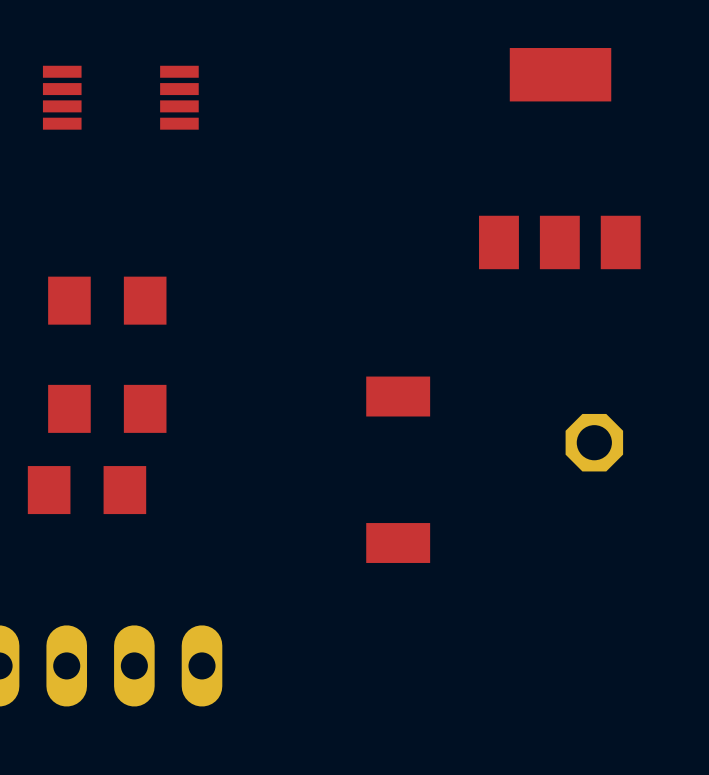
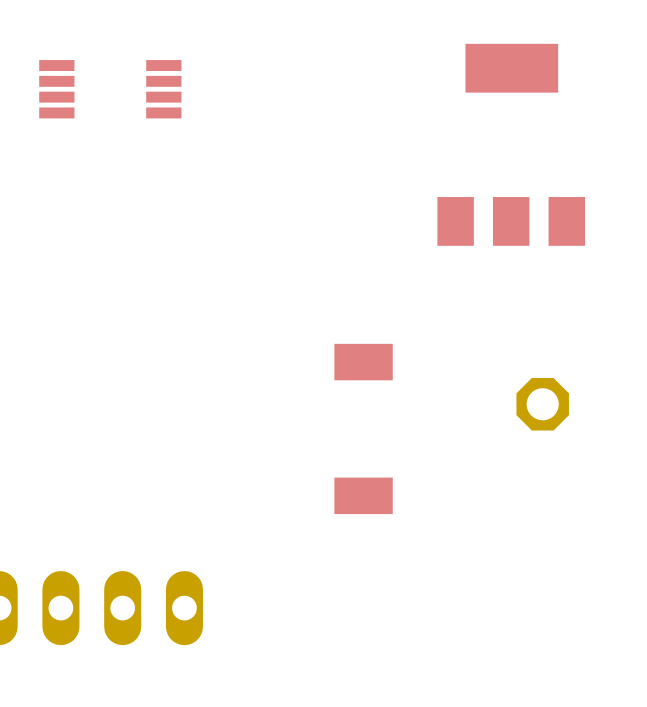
part: (107, 300) -> none
part: (107, 408) -> none
part: (87, 490) -> none

